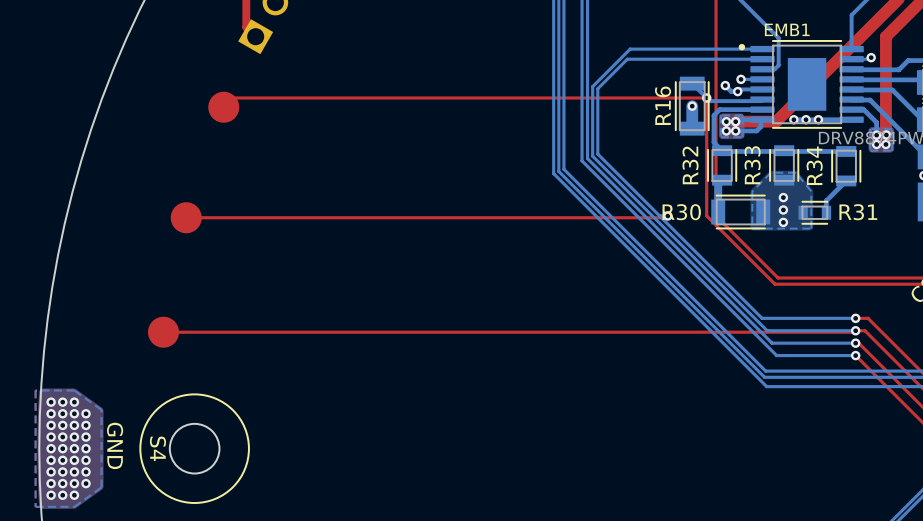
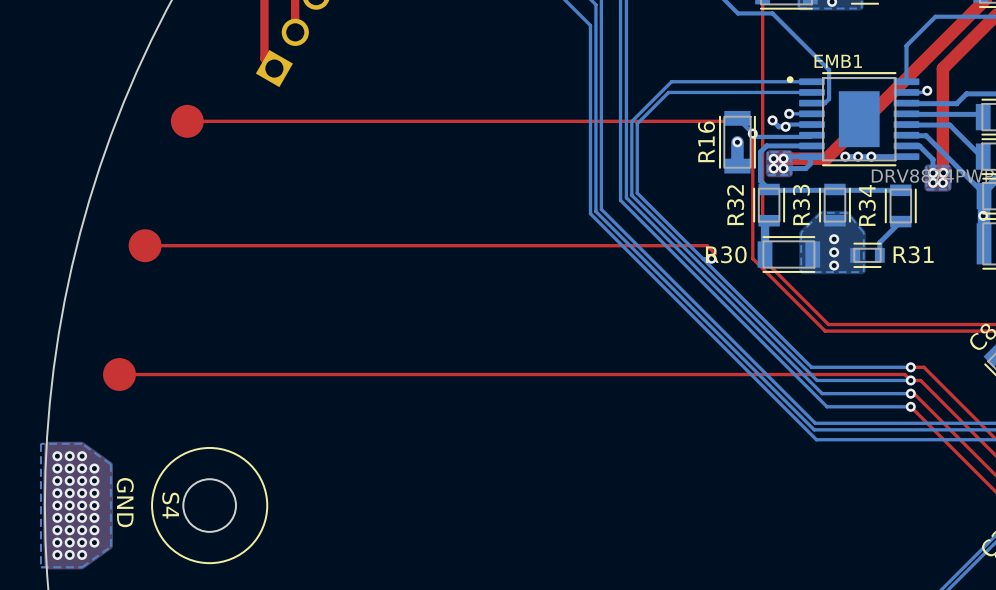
top track: (706, 98) (233, 98) (223, 107) -> (752, 133) (740, 121) (187, 121)
part position: (223, 107) -> (187, 121)
top track: none -> (145, 245) (707, 245) (715, 253)
top track: (667, 215) (666, 217) (186, 217) -> none
part position: (186, 217) -> (145, 245)
top track: (855, 330) (163, 332) -> (910, 380) (904, 374) (119, 374)
part position: (163, 332) -> (119, 374)

